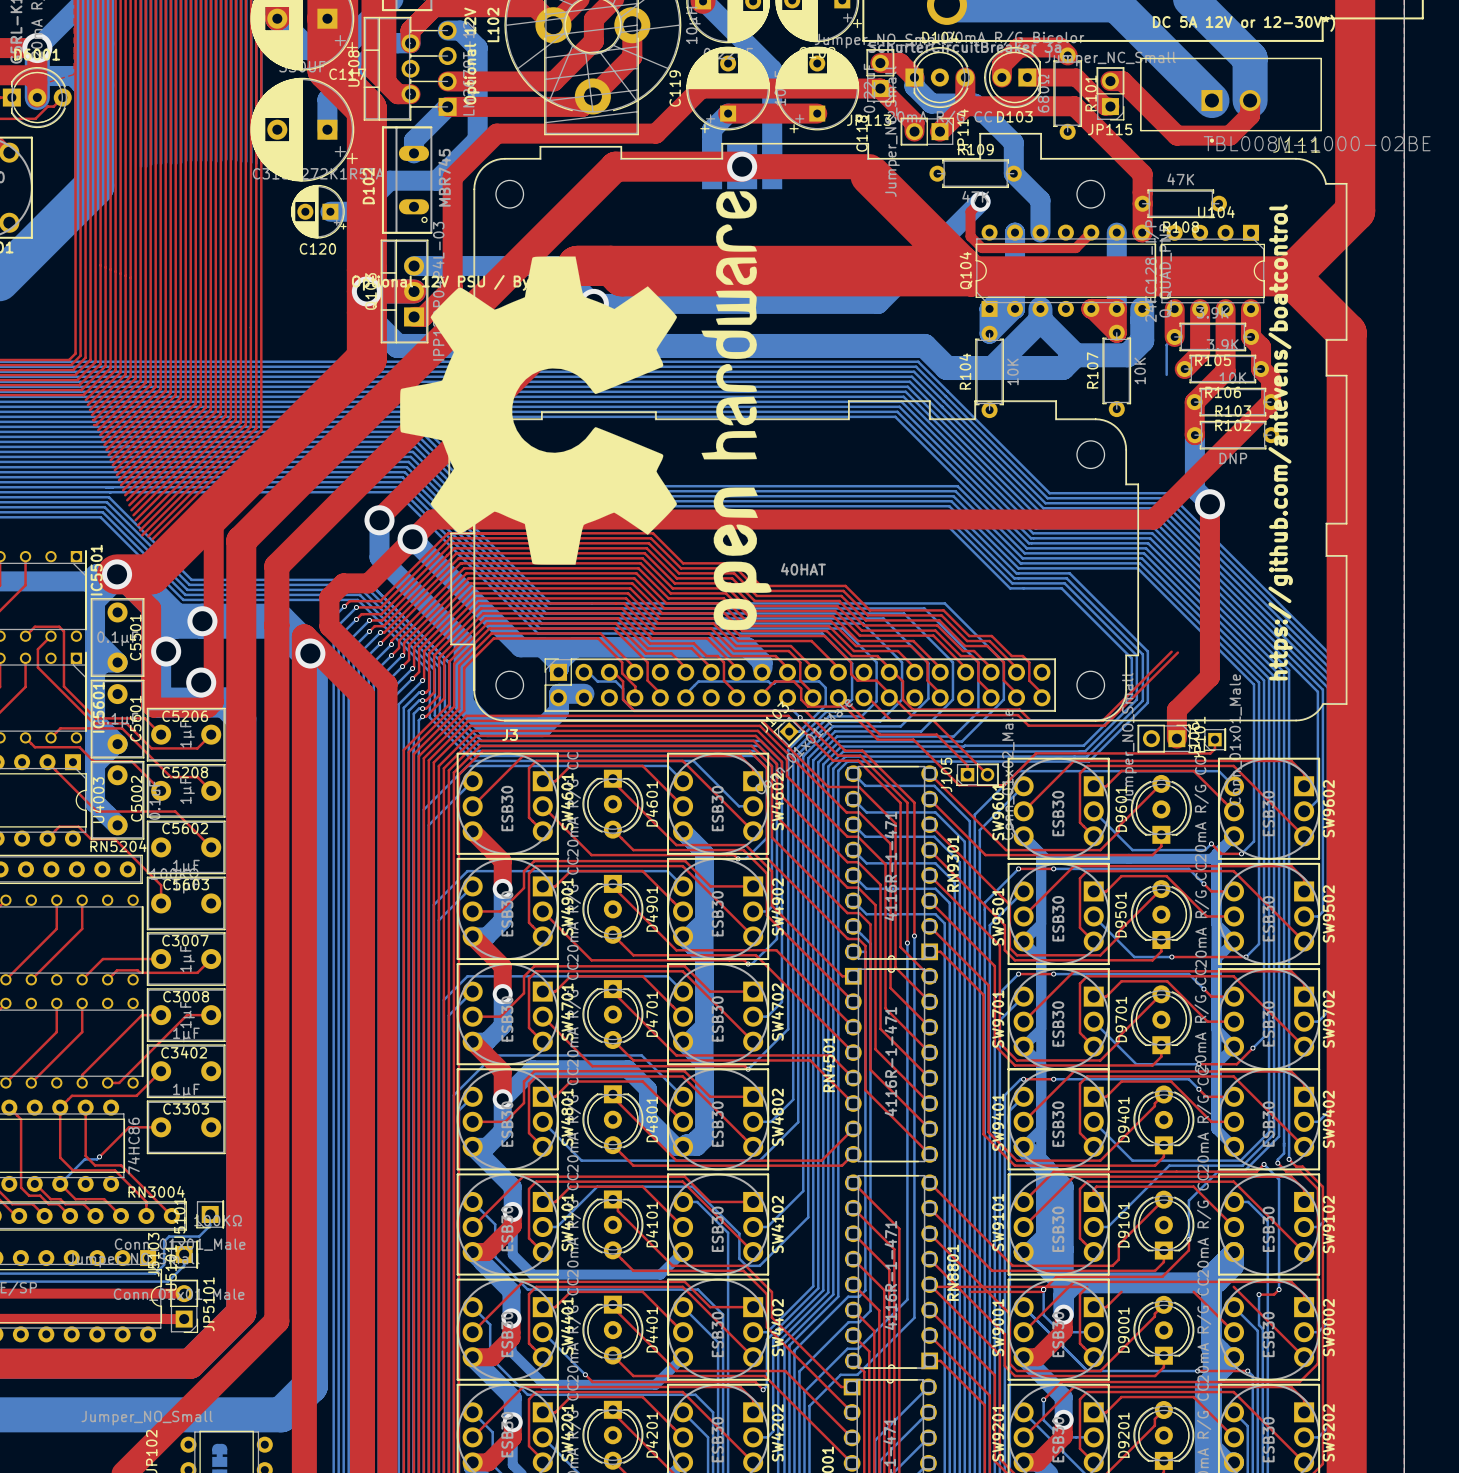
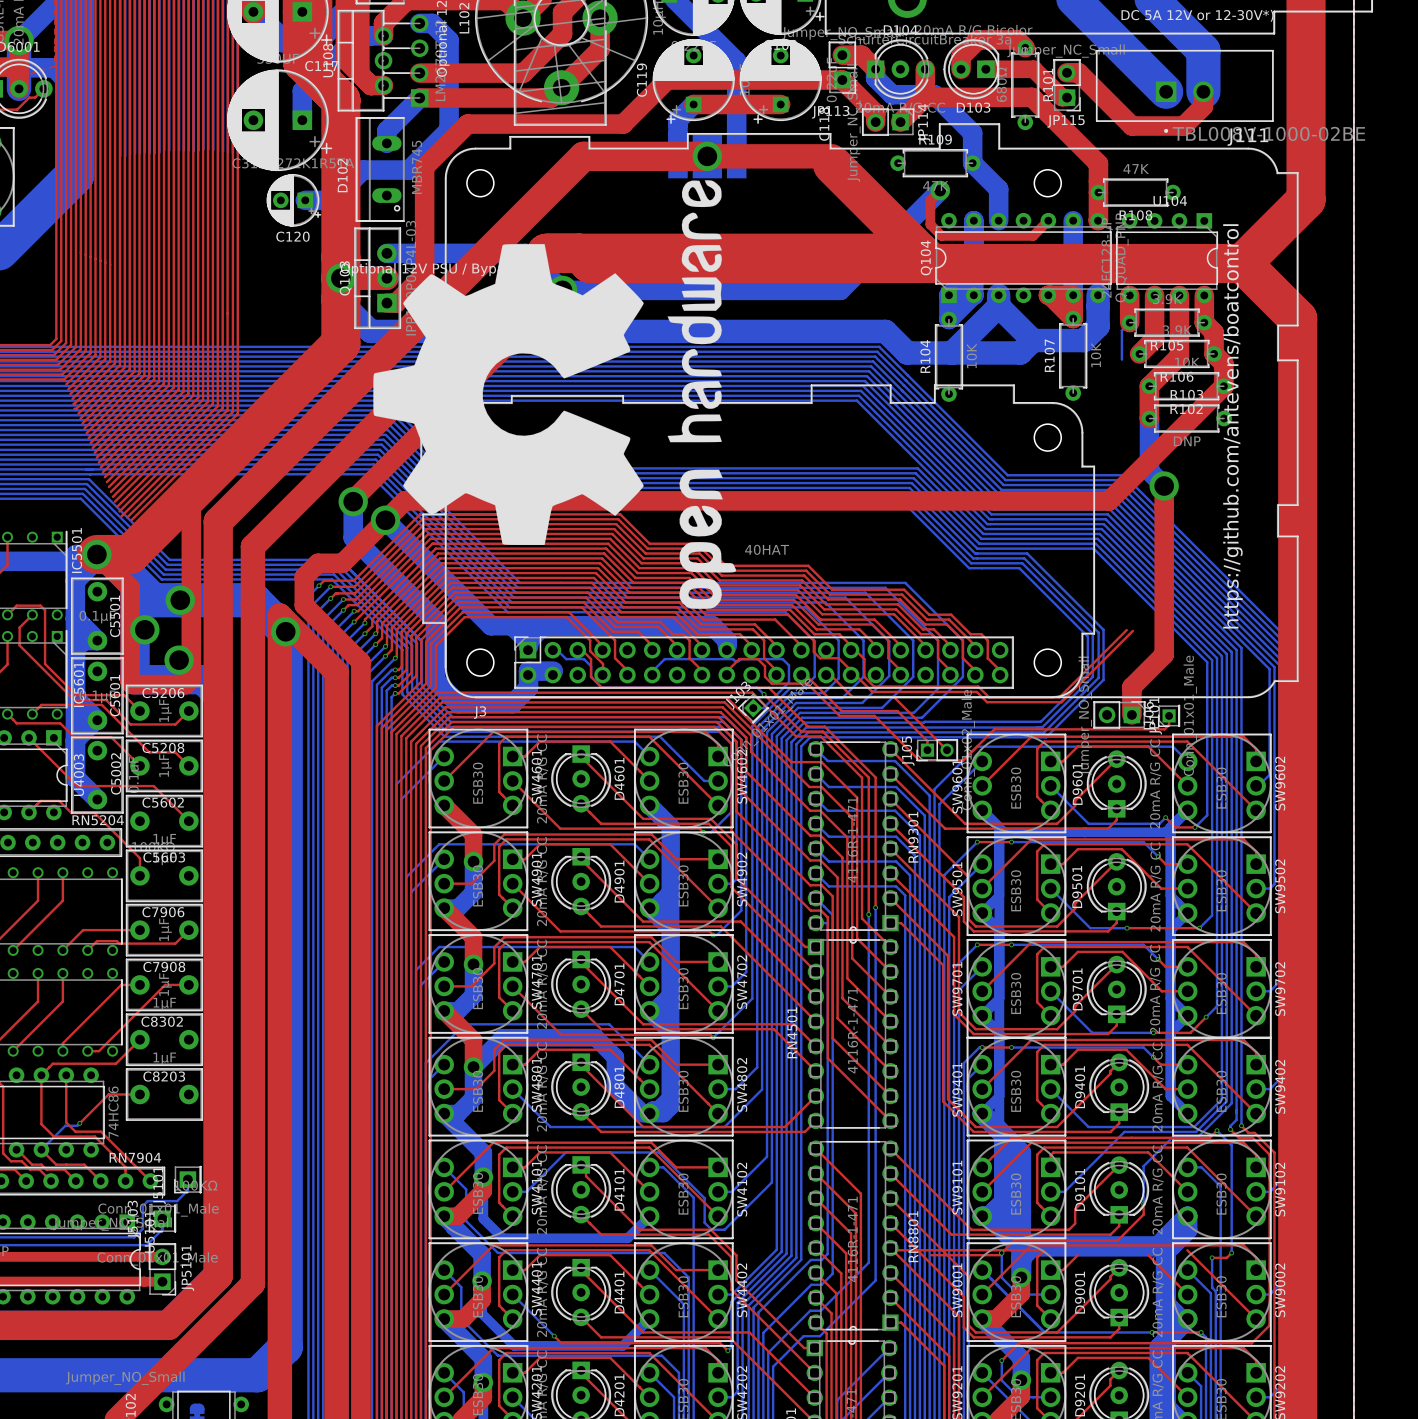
C3007 name: C3007 (185, 940) -> C7906 (163, 912)
C3008 name: C3008 (186, 996) -> C7908 (164, 966)
C3402 name: C3402 (184, 1052) -> C8302 (162, 1021)
C3303 name: C3303 (186, 1108) -> C8203 (164, 1076)
RN3004 name: RN3004 (156, 1191) -> RN7904 (135, 1157)

